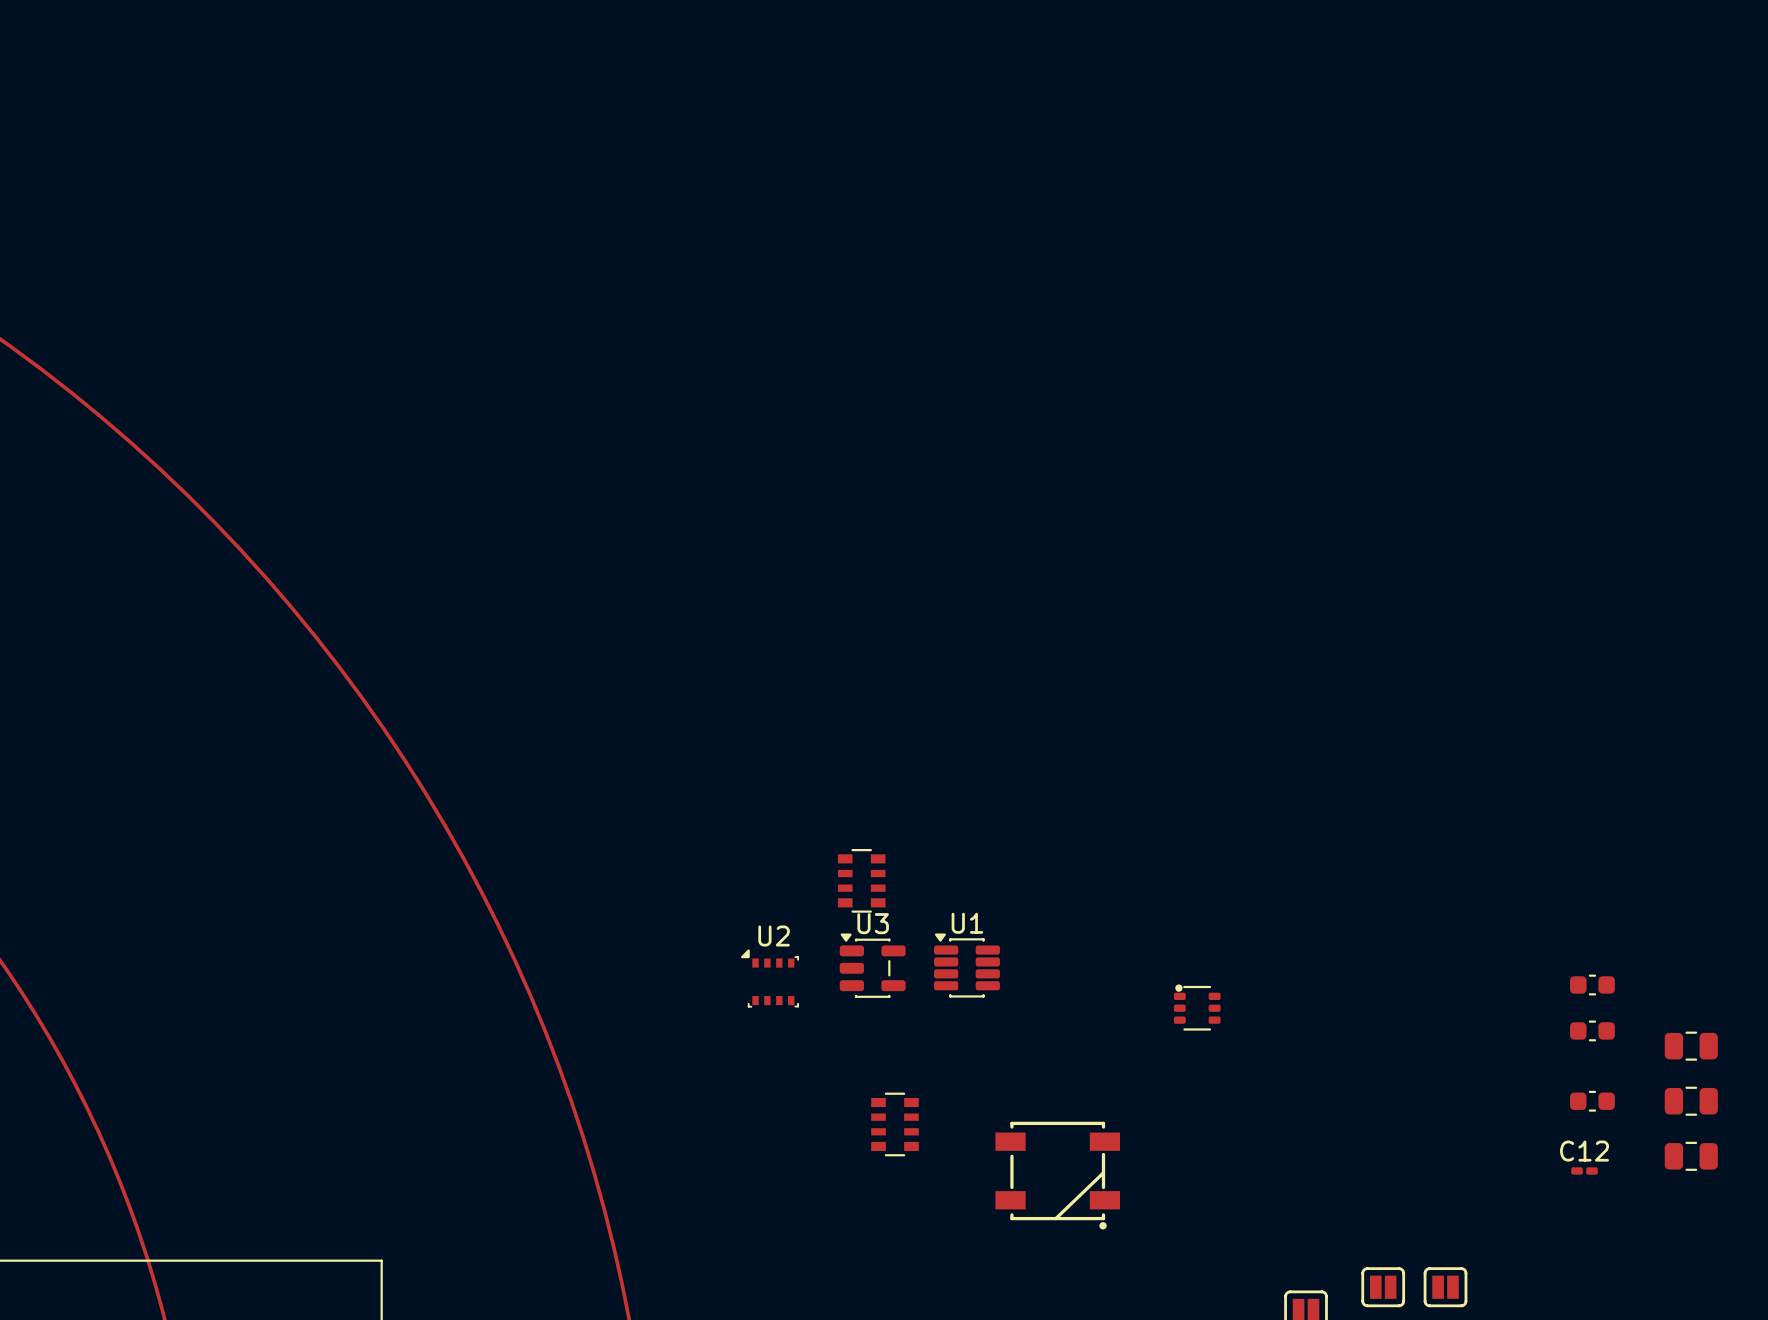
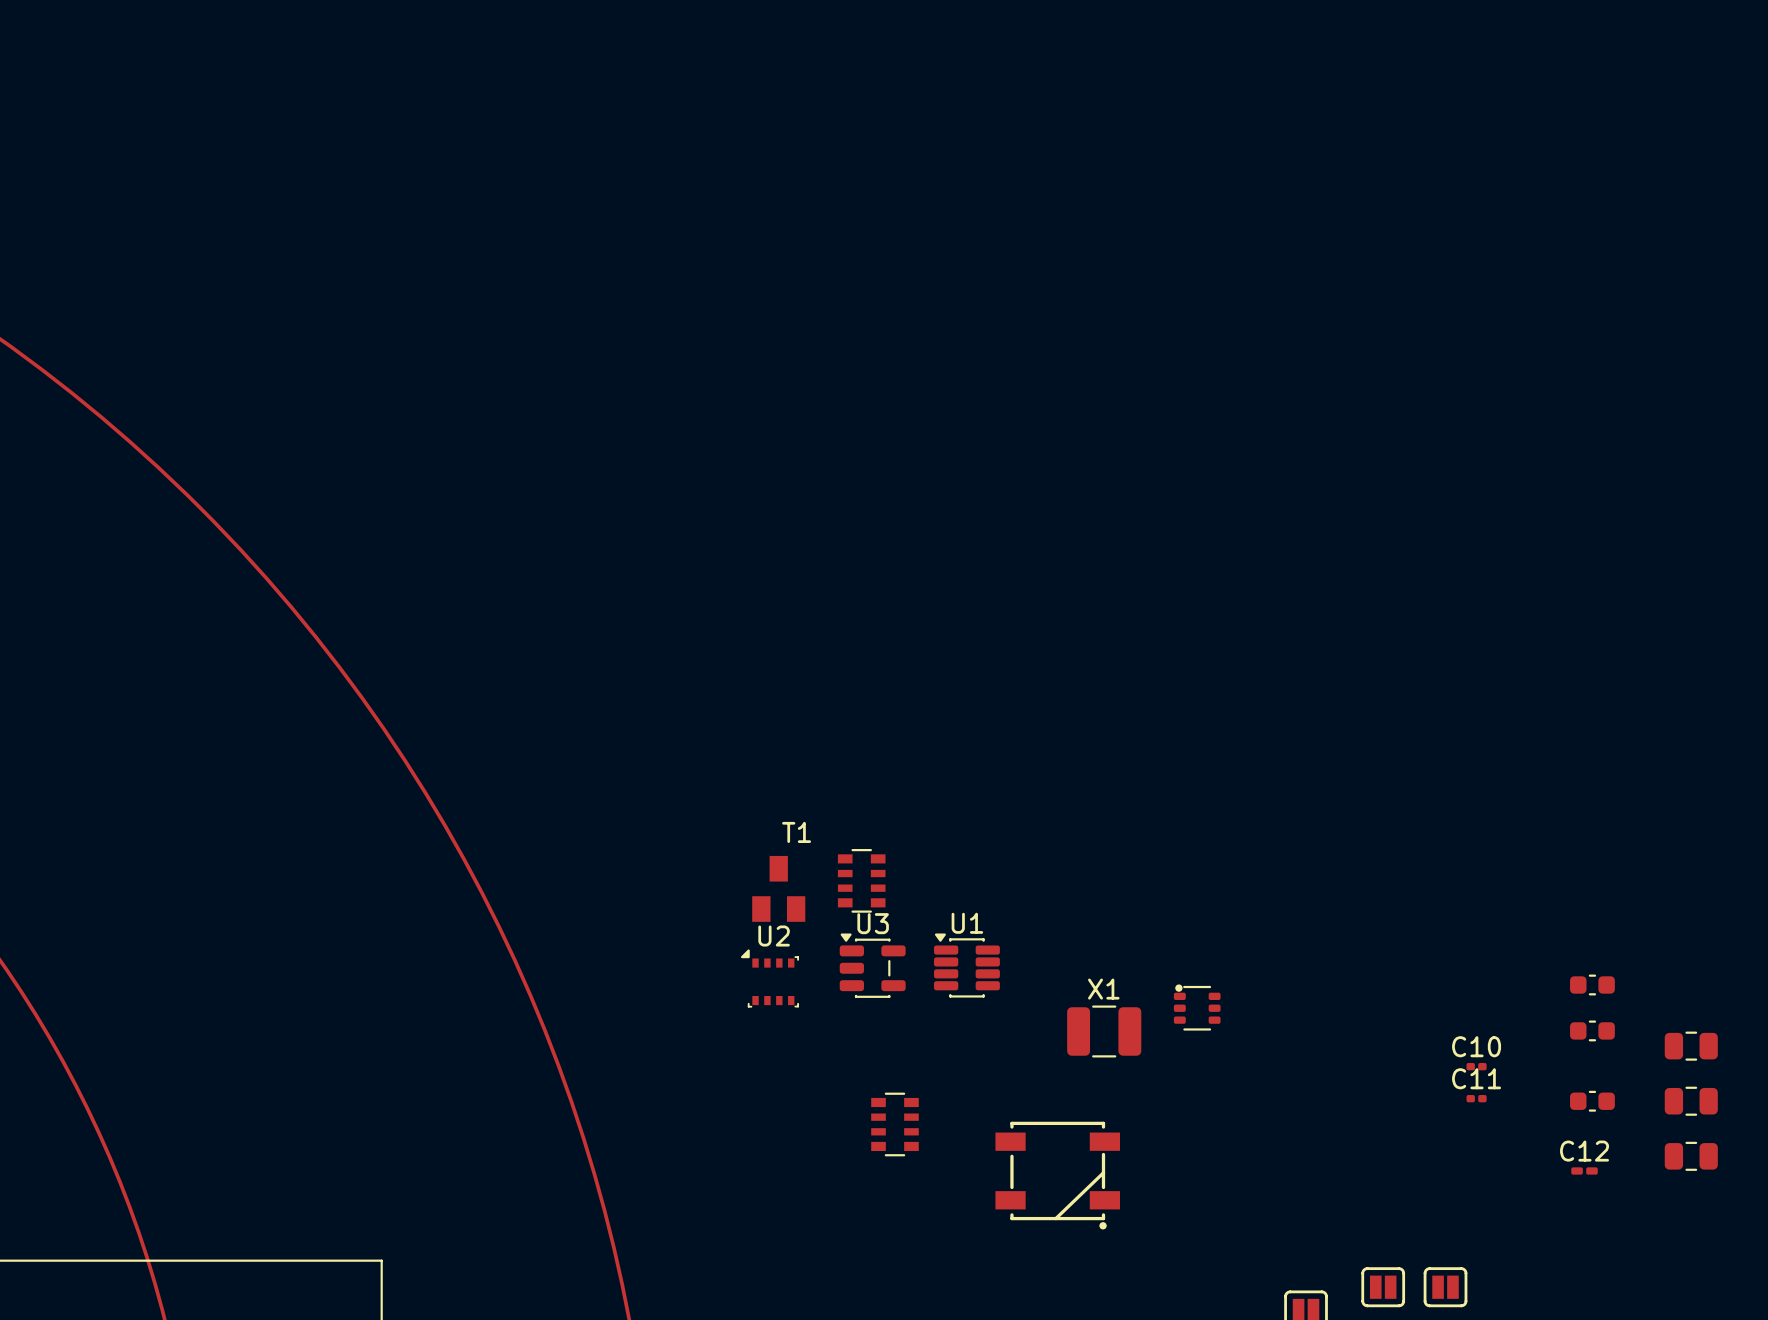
T1: none -> (778, 888)
X1: none -> (1104, 1031)
C10: none -> (1476, 1066)
C11: none -> (1476, 1098)

